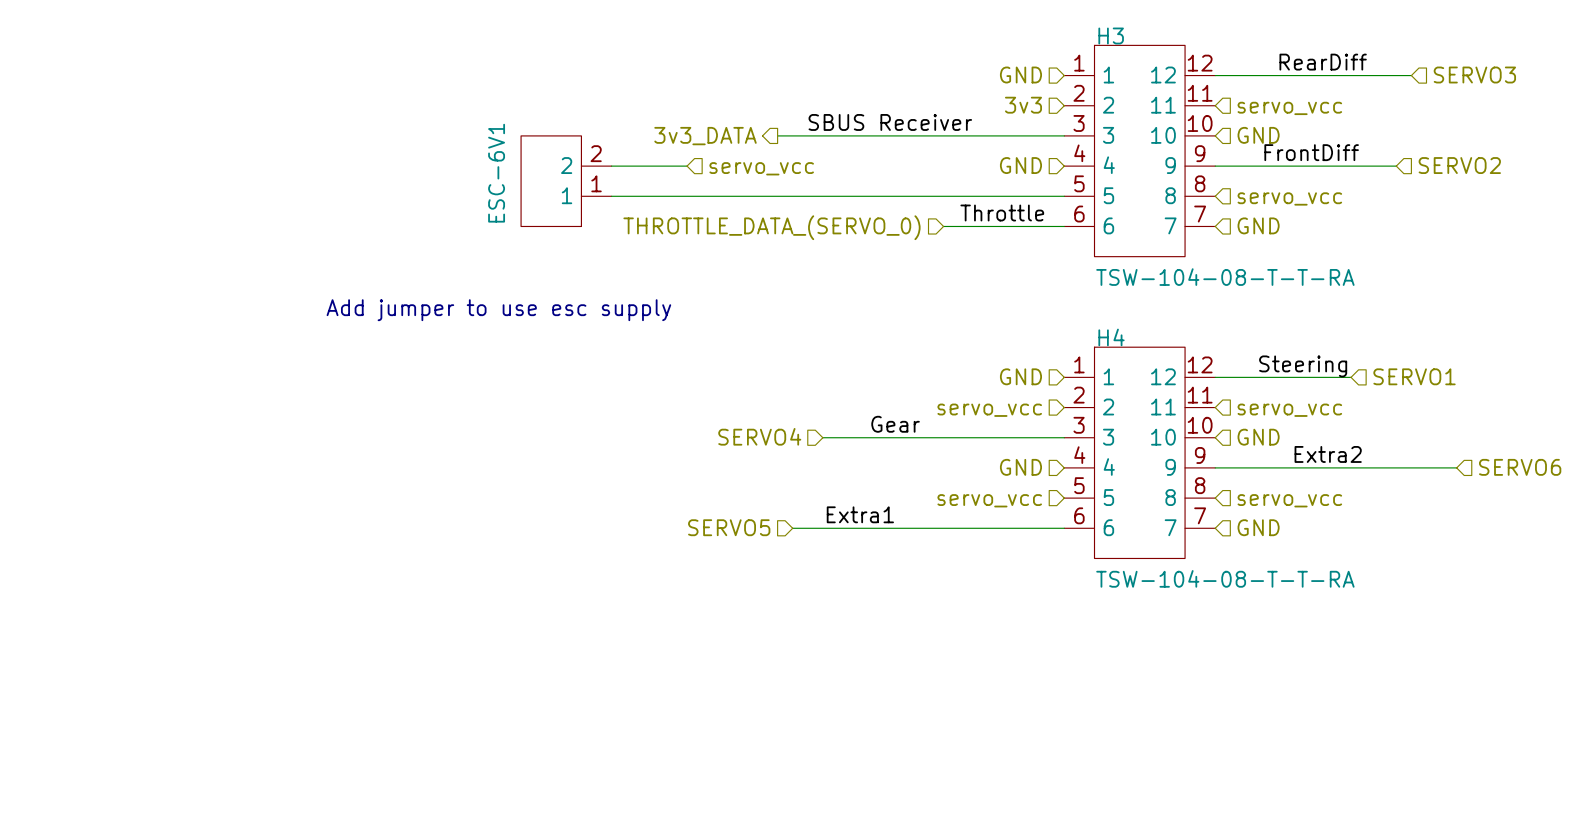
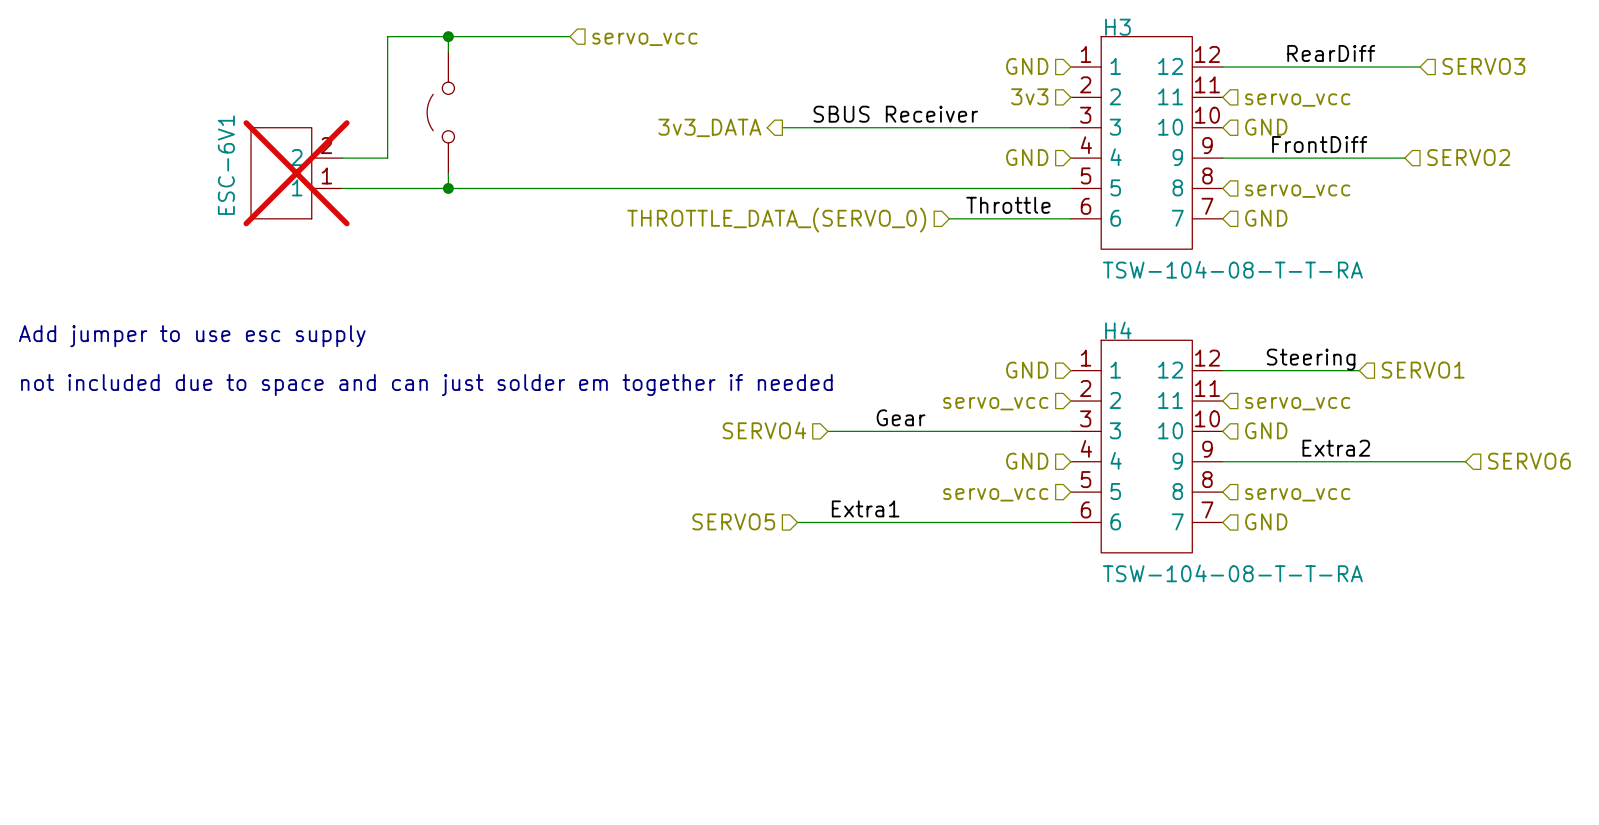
wire: none -> (448, 36) (448, 51)
junction: none -> (448, 36)
wire: none -> (569, 36) (387, 36) (387, 158) (342, 158)
part: none -> (440, 112)
wire: (611, 166) (687, 166) -> none
hierarchical label position: servo_vcc (761, 168) -> servo_vcc (644, 39)
ESC-6V1 do-not-place cross: none -> (296, 173)
wire: none -> (448, 173) (448, 188)
ESC-6V1 position: (566, 181) -> (296, 173)
wire: none -> (342, 188) (615, 188)
junction: none -> (448, 188)
text: Add jumper to use esc supply (498, 310) -> none
text: none -> Add jumper to use esc supply (192, 336)
text: none -> not included due to space and can just solder em together if needed (426, 385)

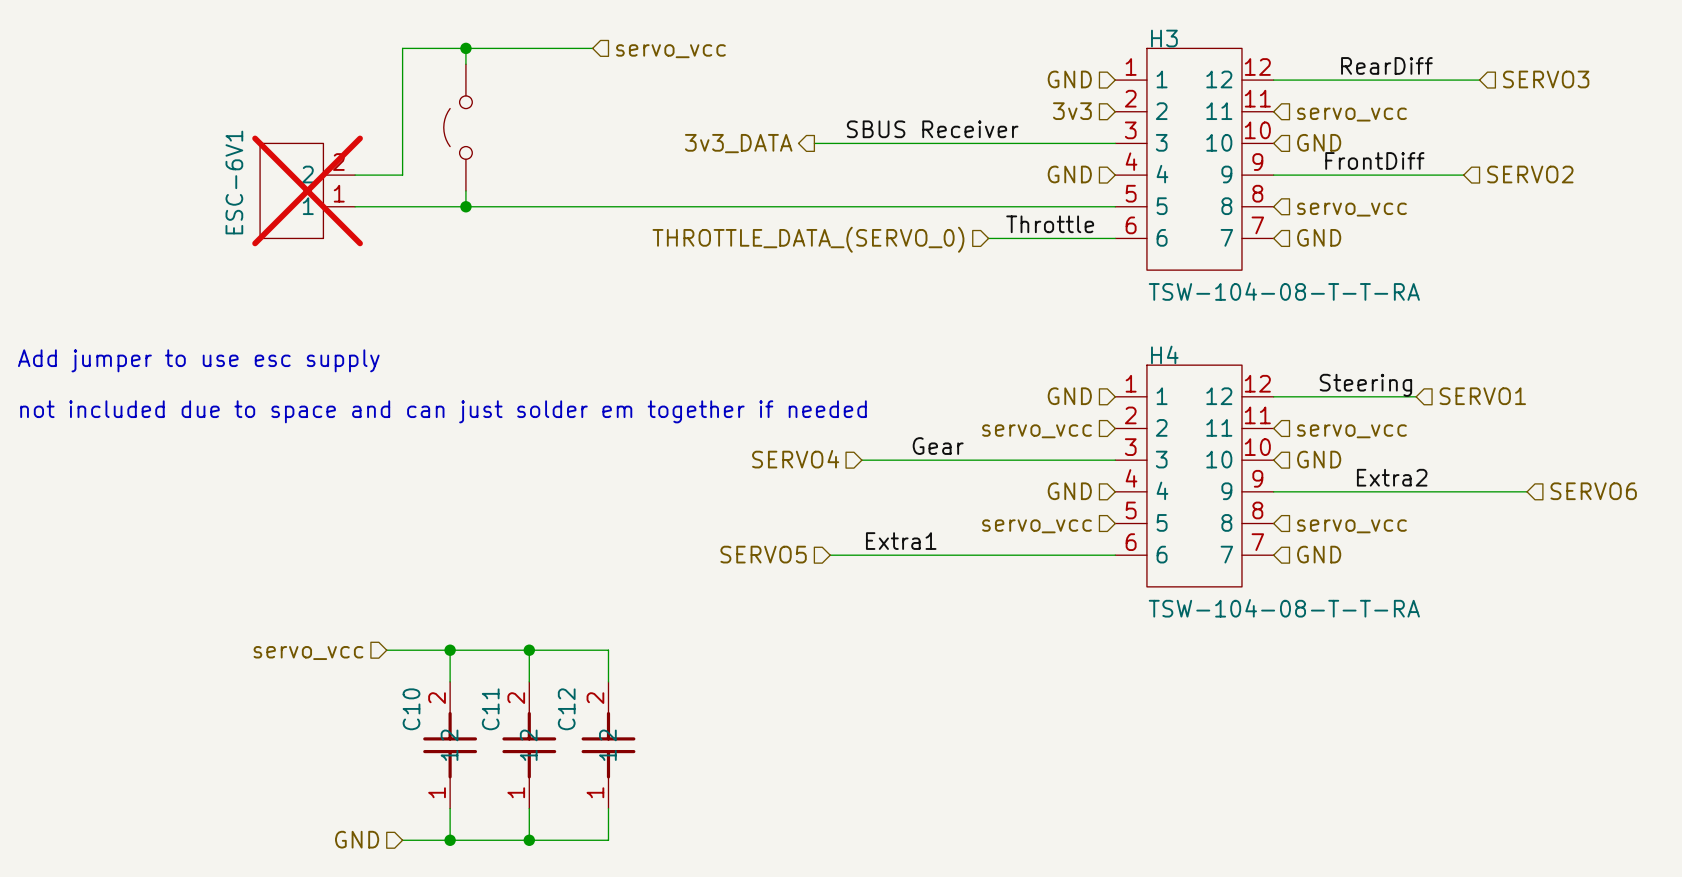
wire: none -> (386, 650) (608, 650) (608, 681)
wire: none -> (450, 650) (450, 681)
junction: none -> (450, 650)
wire: none -> (529, 650) (529, 681)
junction: none -> (529, 650)
hierarchical label: none -> servo_vcc (308, 653)
C10: none -> (450, 745)
C11: none -> (529, 745)
C12: none -> (608, 745)
wire: none -> (450, 808) (450, 840)
wire: none -> (529, 808) (529, 840)
wire: none -> (608, 808) (608, 840) (402, 840)
hierarchical label: none -> GND (357, 839)
junction: none -> (450, 840)
junction: none -> (529, 840)

